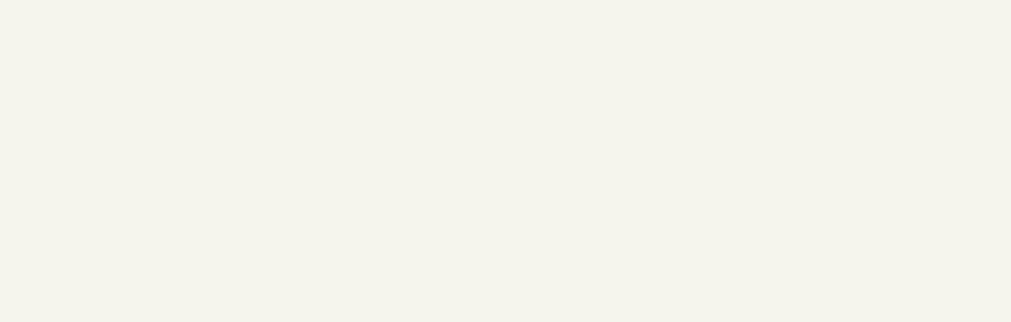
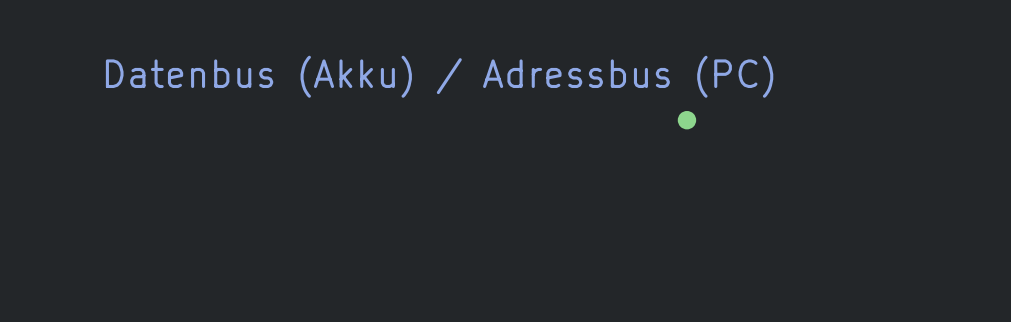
text: none -> Datenbus (Akku) / Adressbus (PC) (439, 76)
junction: none -> (686, 120)

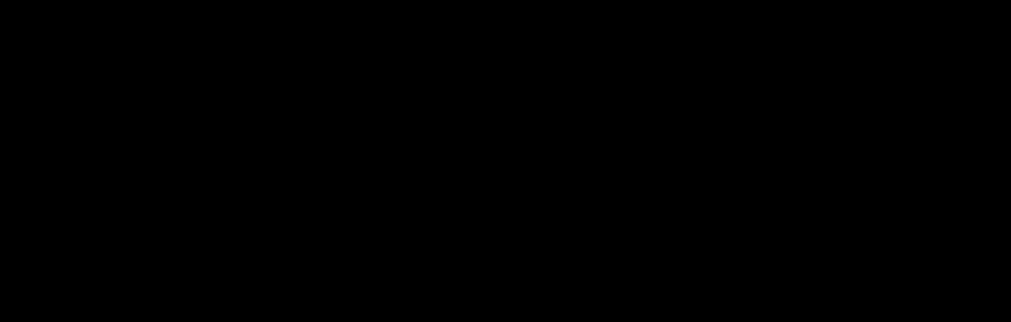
text: Datenbus (Akku) / Adressbus (PC) (439, 76) -> none
junction: (686, 120) -> none

